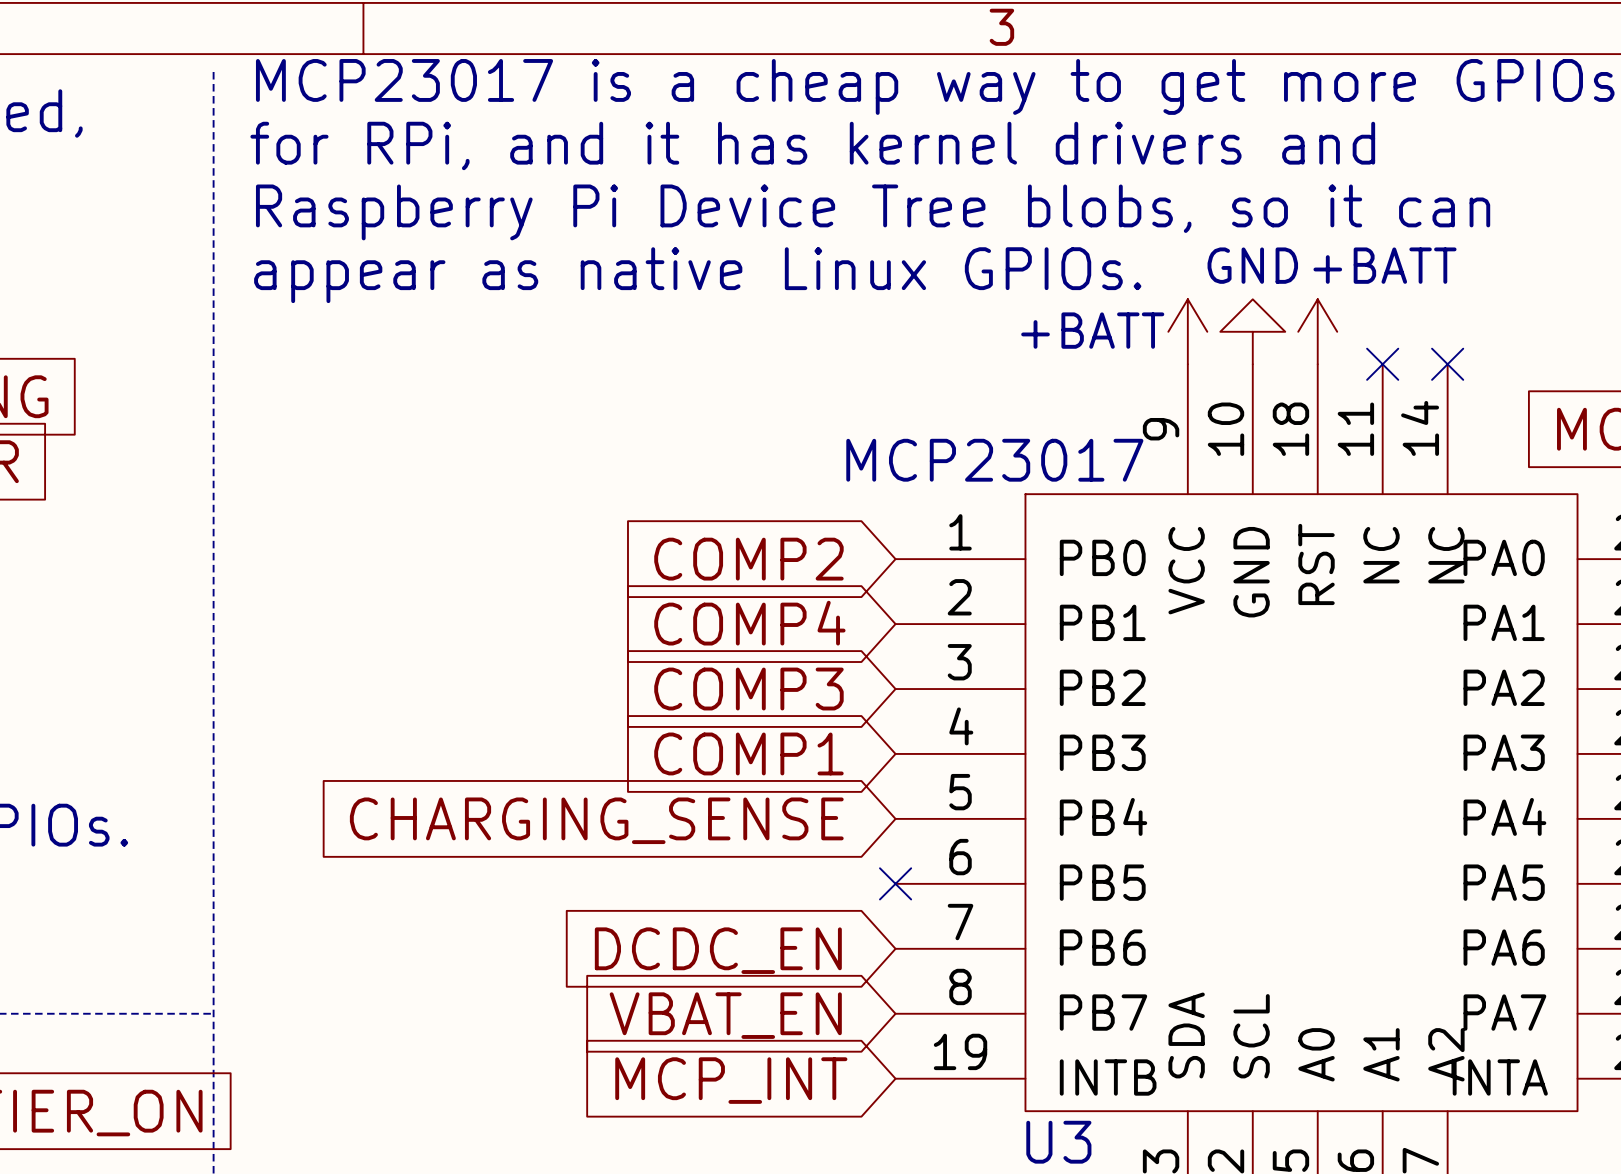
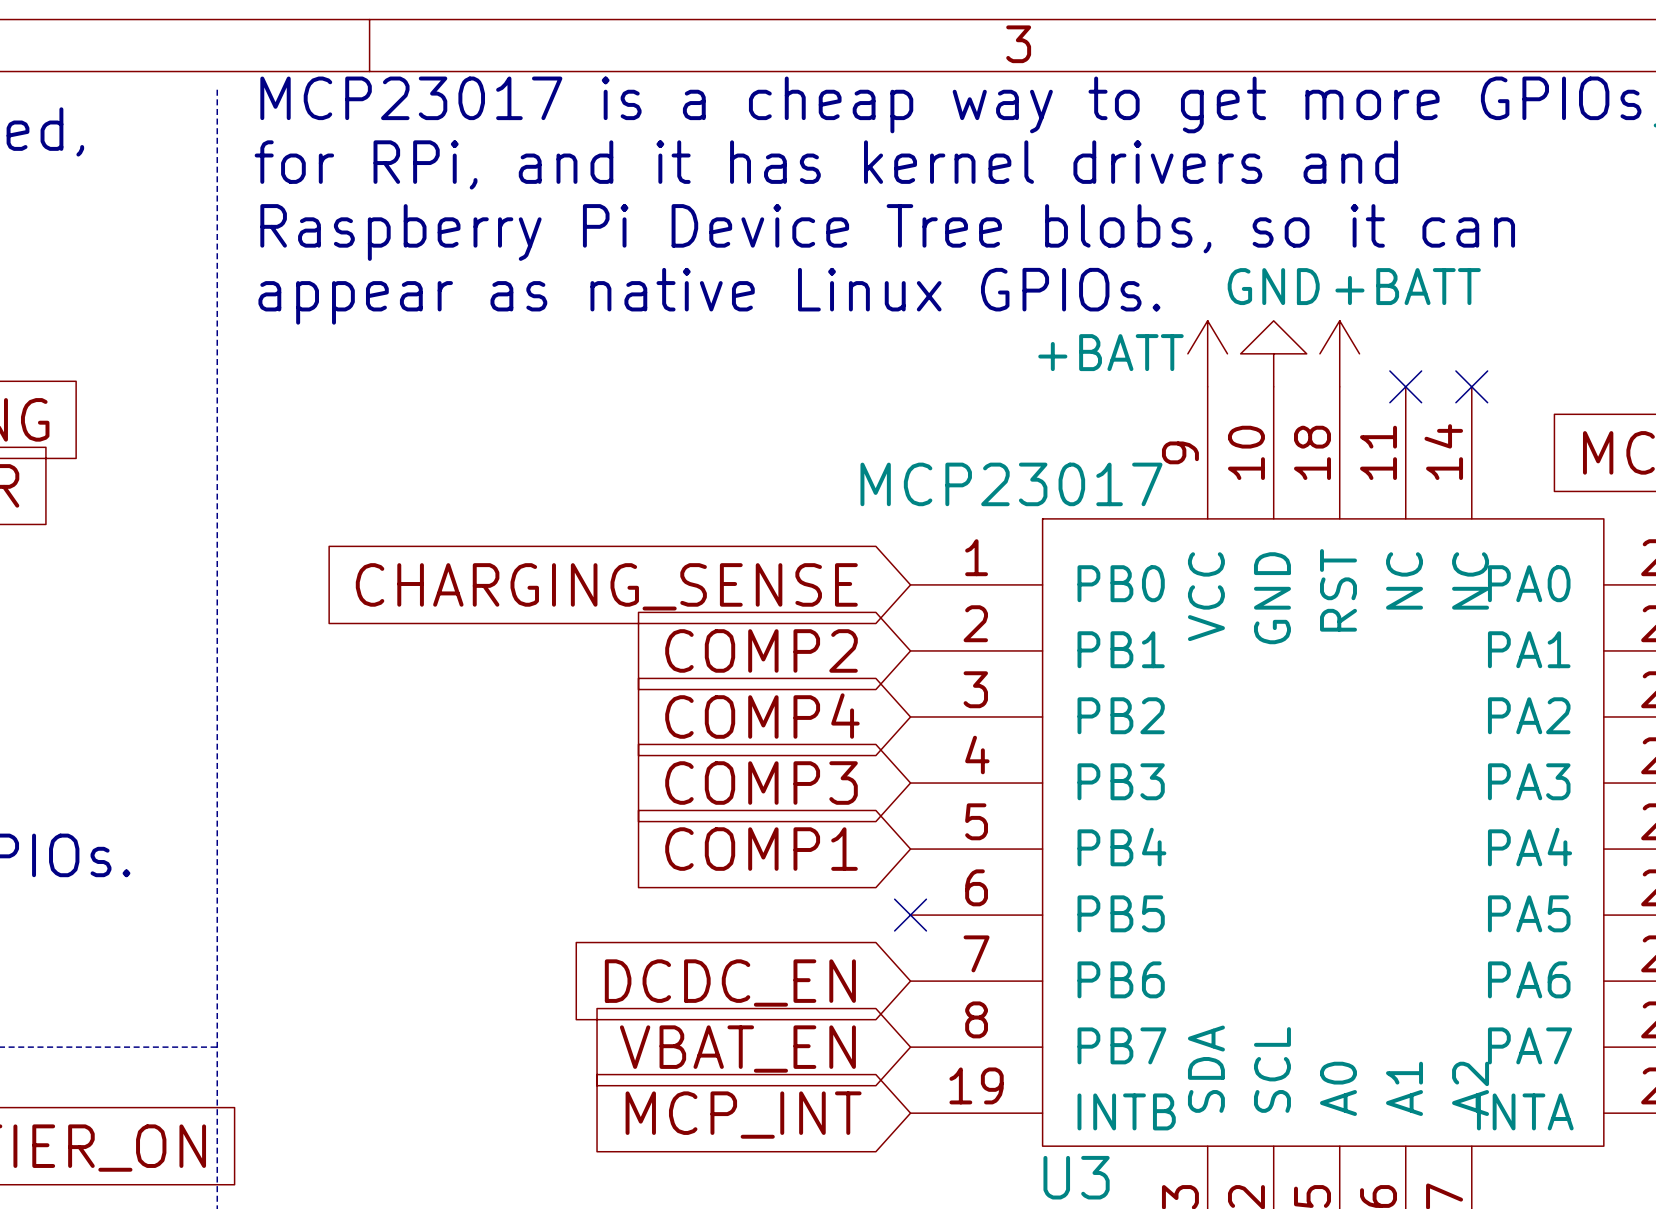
global label: COMP2 (748, 559) -> CHARGING_SENSE (606, 586)
global label: COMP4 (749, 623) -> COMP2 (761, 650)
global label: COMP3 (748, 689) -> COMP4 (762, 716)
global label: COMP1 (748, 753) -> COMP3 (761, 783)
global label: CHARGING_SENSE (596, 820) -> COMP1 (761, 849)

